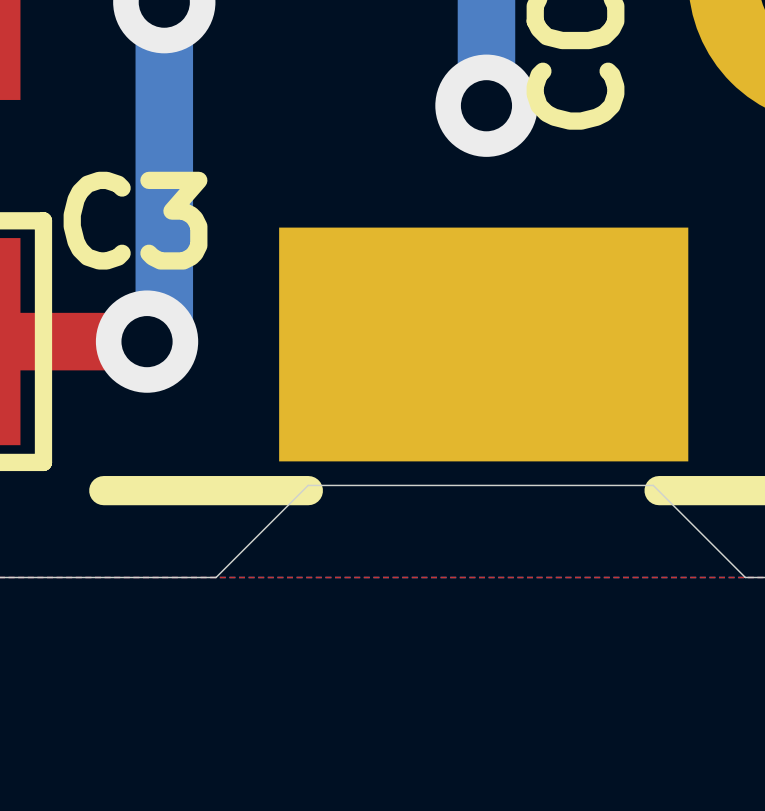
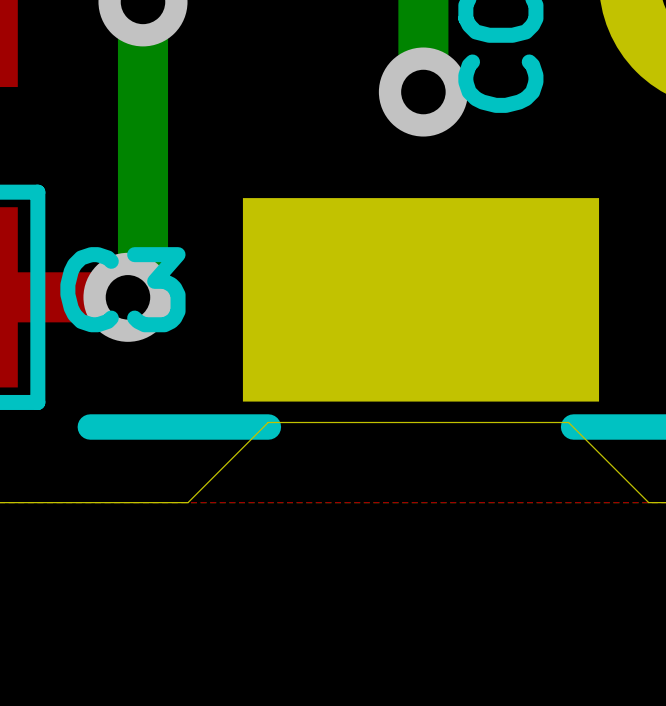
C3 name position: C3 (135, 220) -> C3 (122, 289)

